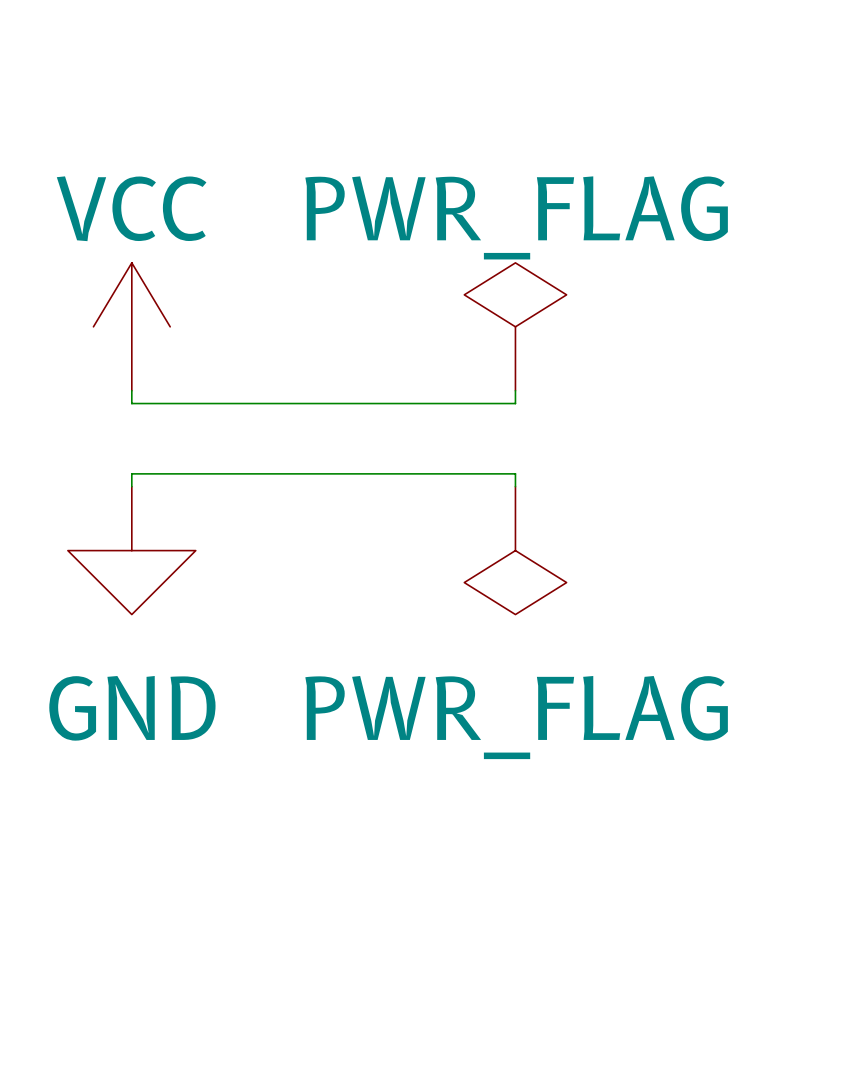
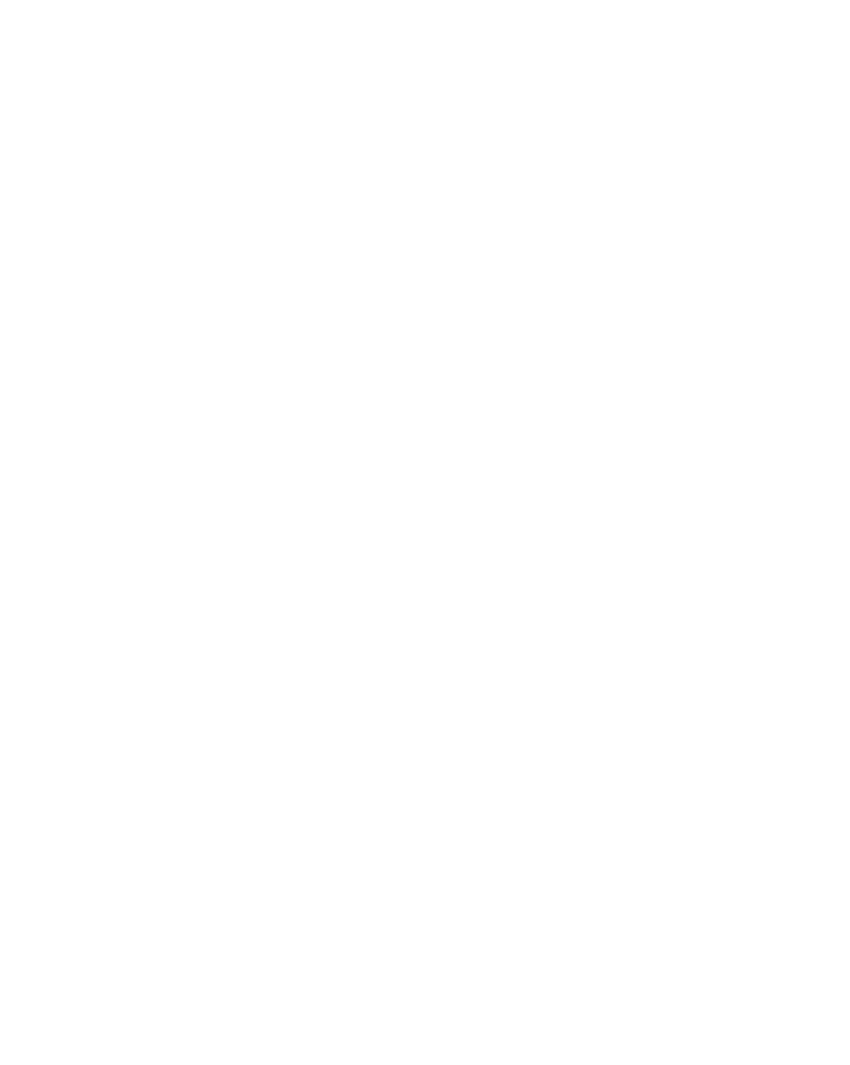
power symbol: VCC (131, 326) -> none
power symbol: PWR_FLAG (515, 326) -> none
wire: (131, 390) (131, 403) (515, 403) (515, 390) -> none
wire: (131, 486) (131, 473) (515, 473) (515, 486) -> none
power symbol: GND (131, 550) -> none
power symbol: PWR_FLAG (515, 550) -> none

